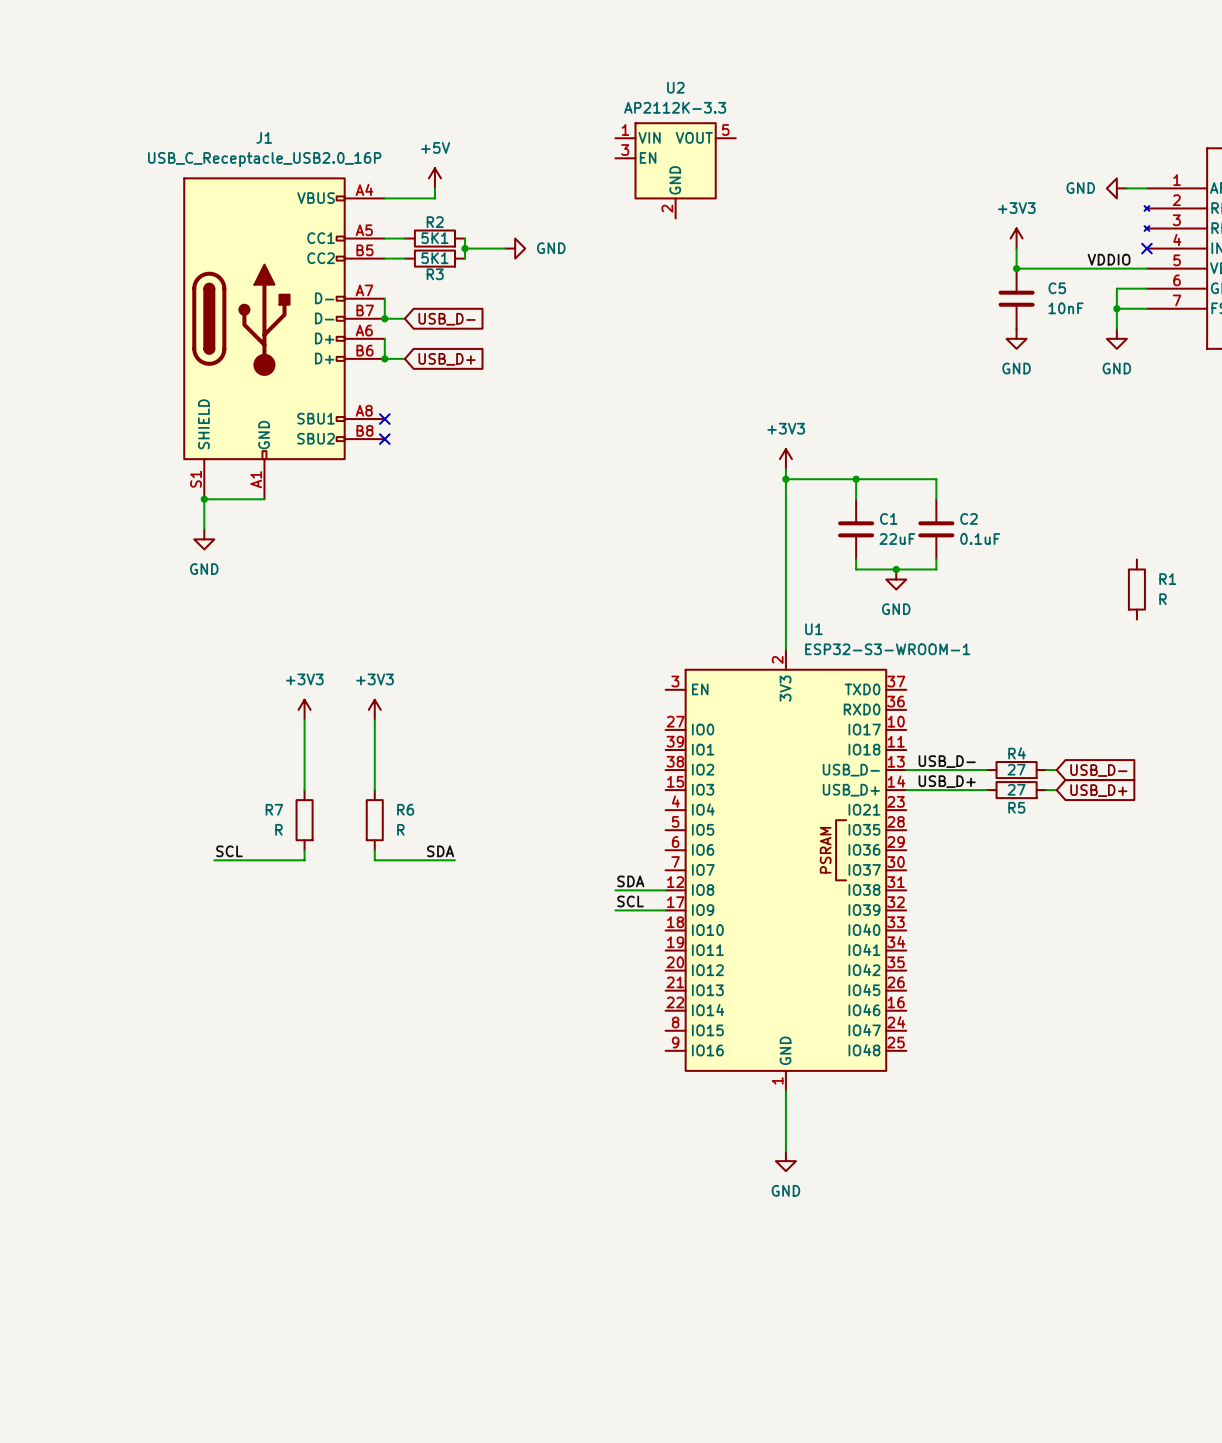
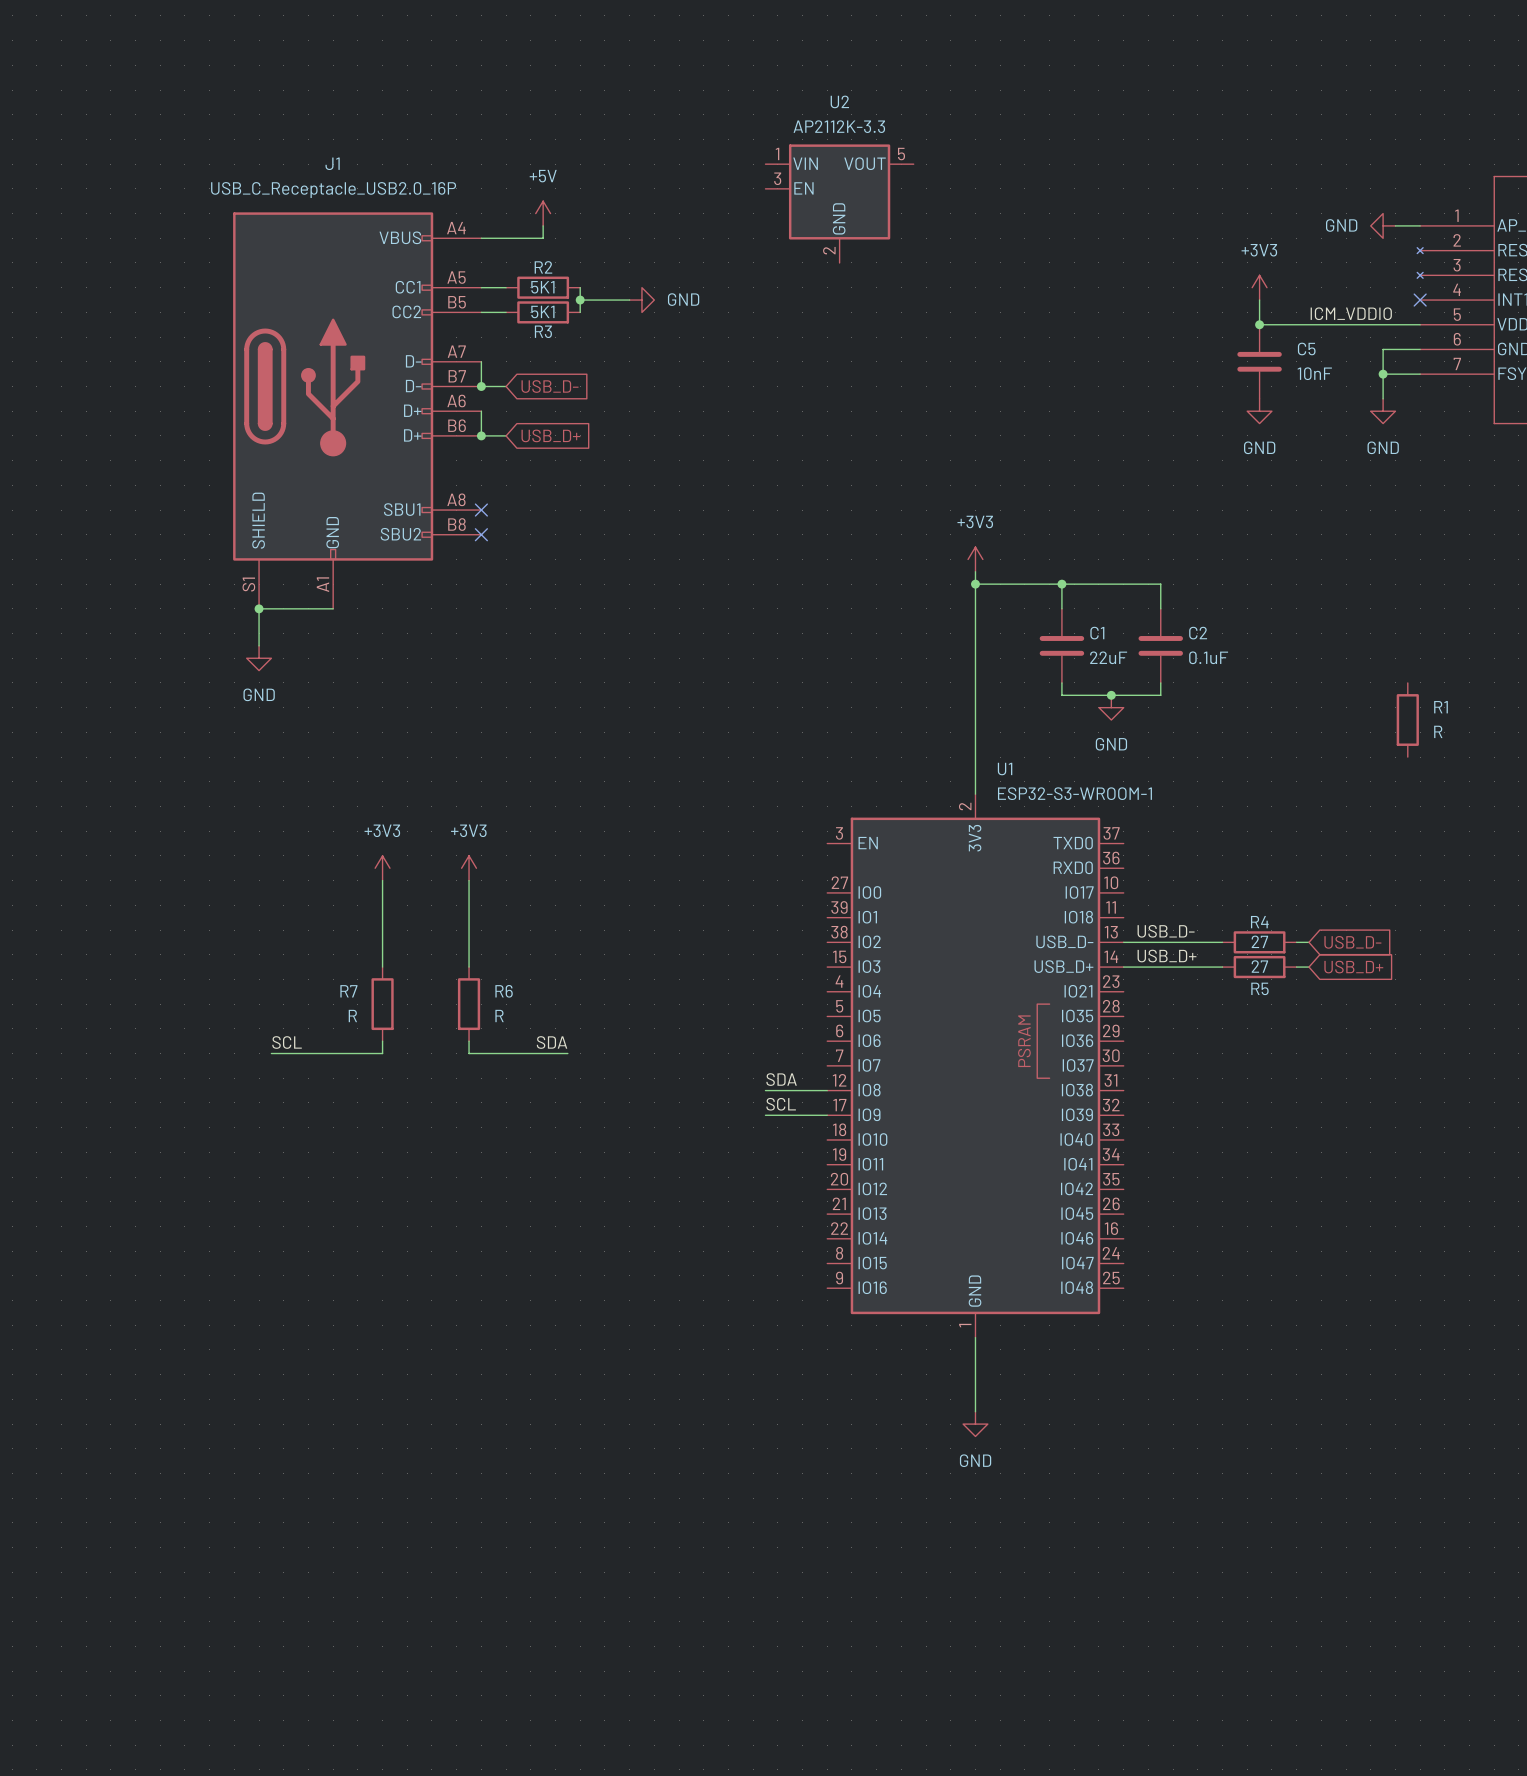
label: VDDIO (1109, 259) -> ICM_VDDIO (1351, 313)

